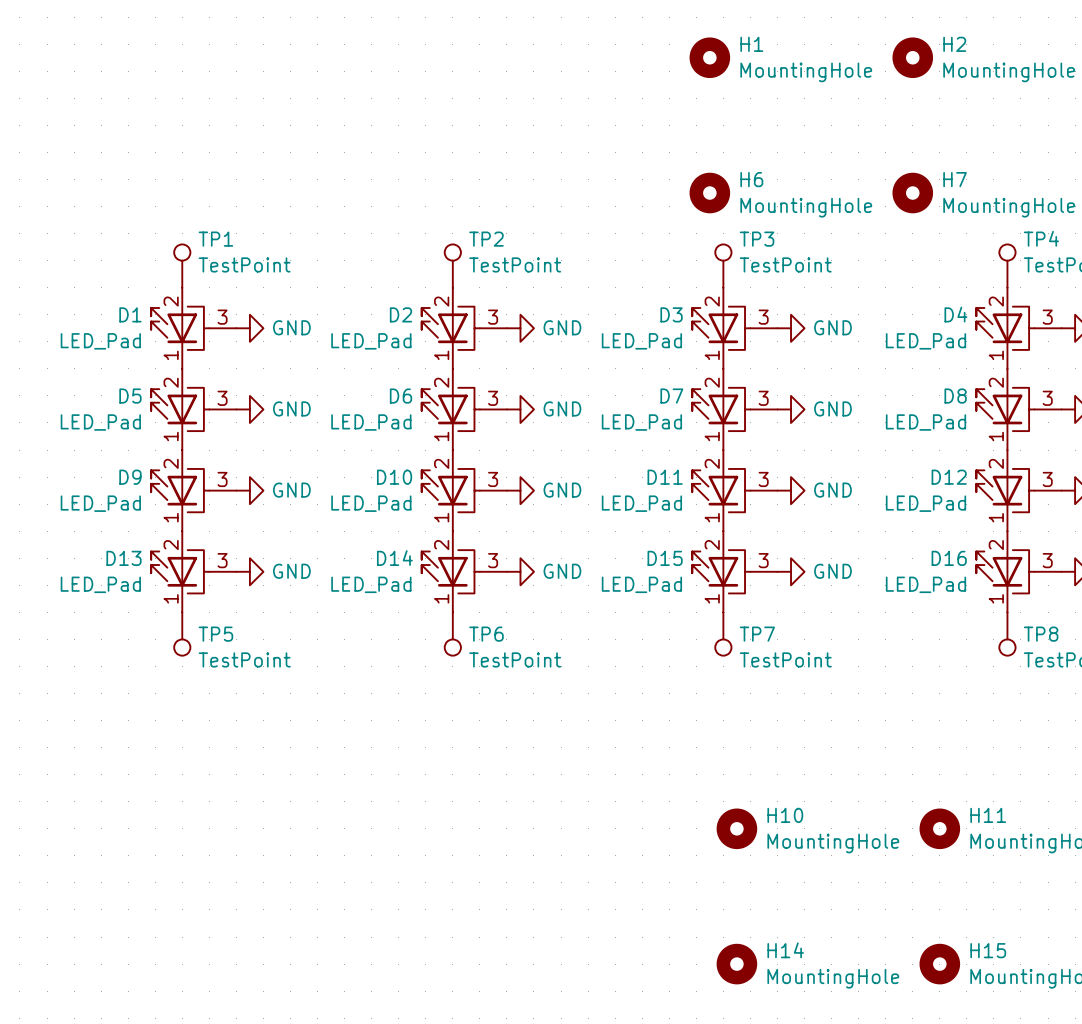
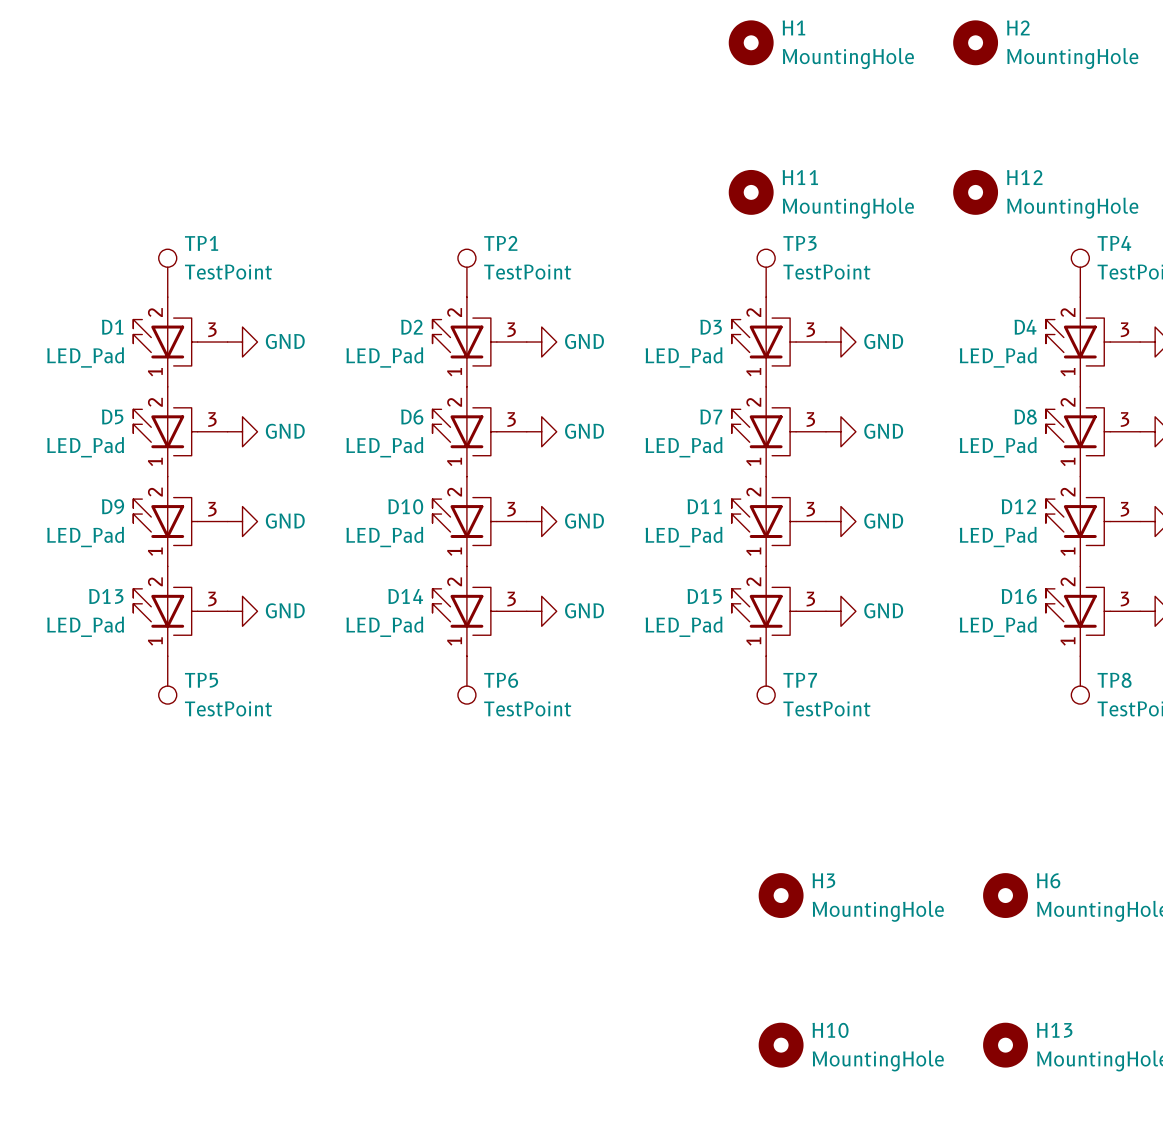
H6 name: H6 (751, 179) -> H11 (800, 177)
H7 name: H7 (955, 179) -> H12 (1024, 177)
H10 name: H10 (785, 815) -> H3 (823, 880)
H11 name: H11 (988, 815) -> H6 (1048, 880)
H14 name: H14 (785, 950) -> H10 (830, 1030)
H15 name: H15 (988, 950) -> H13 (1054, 1030)

